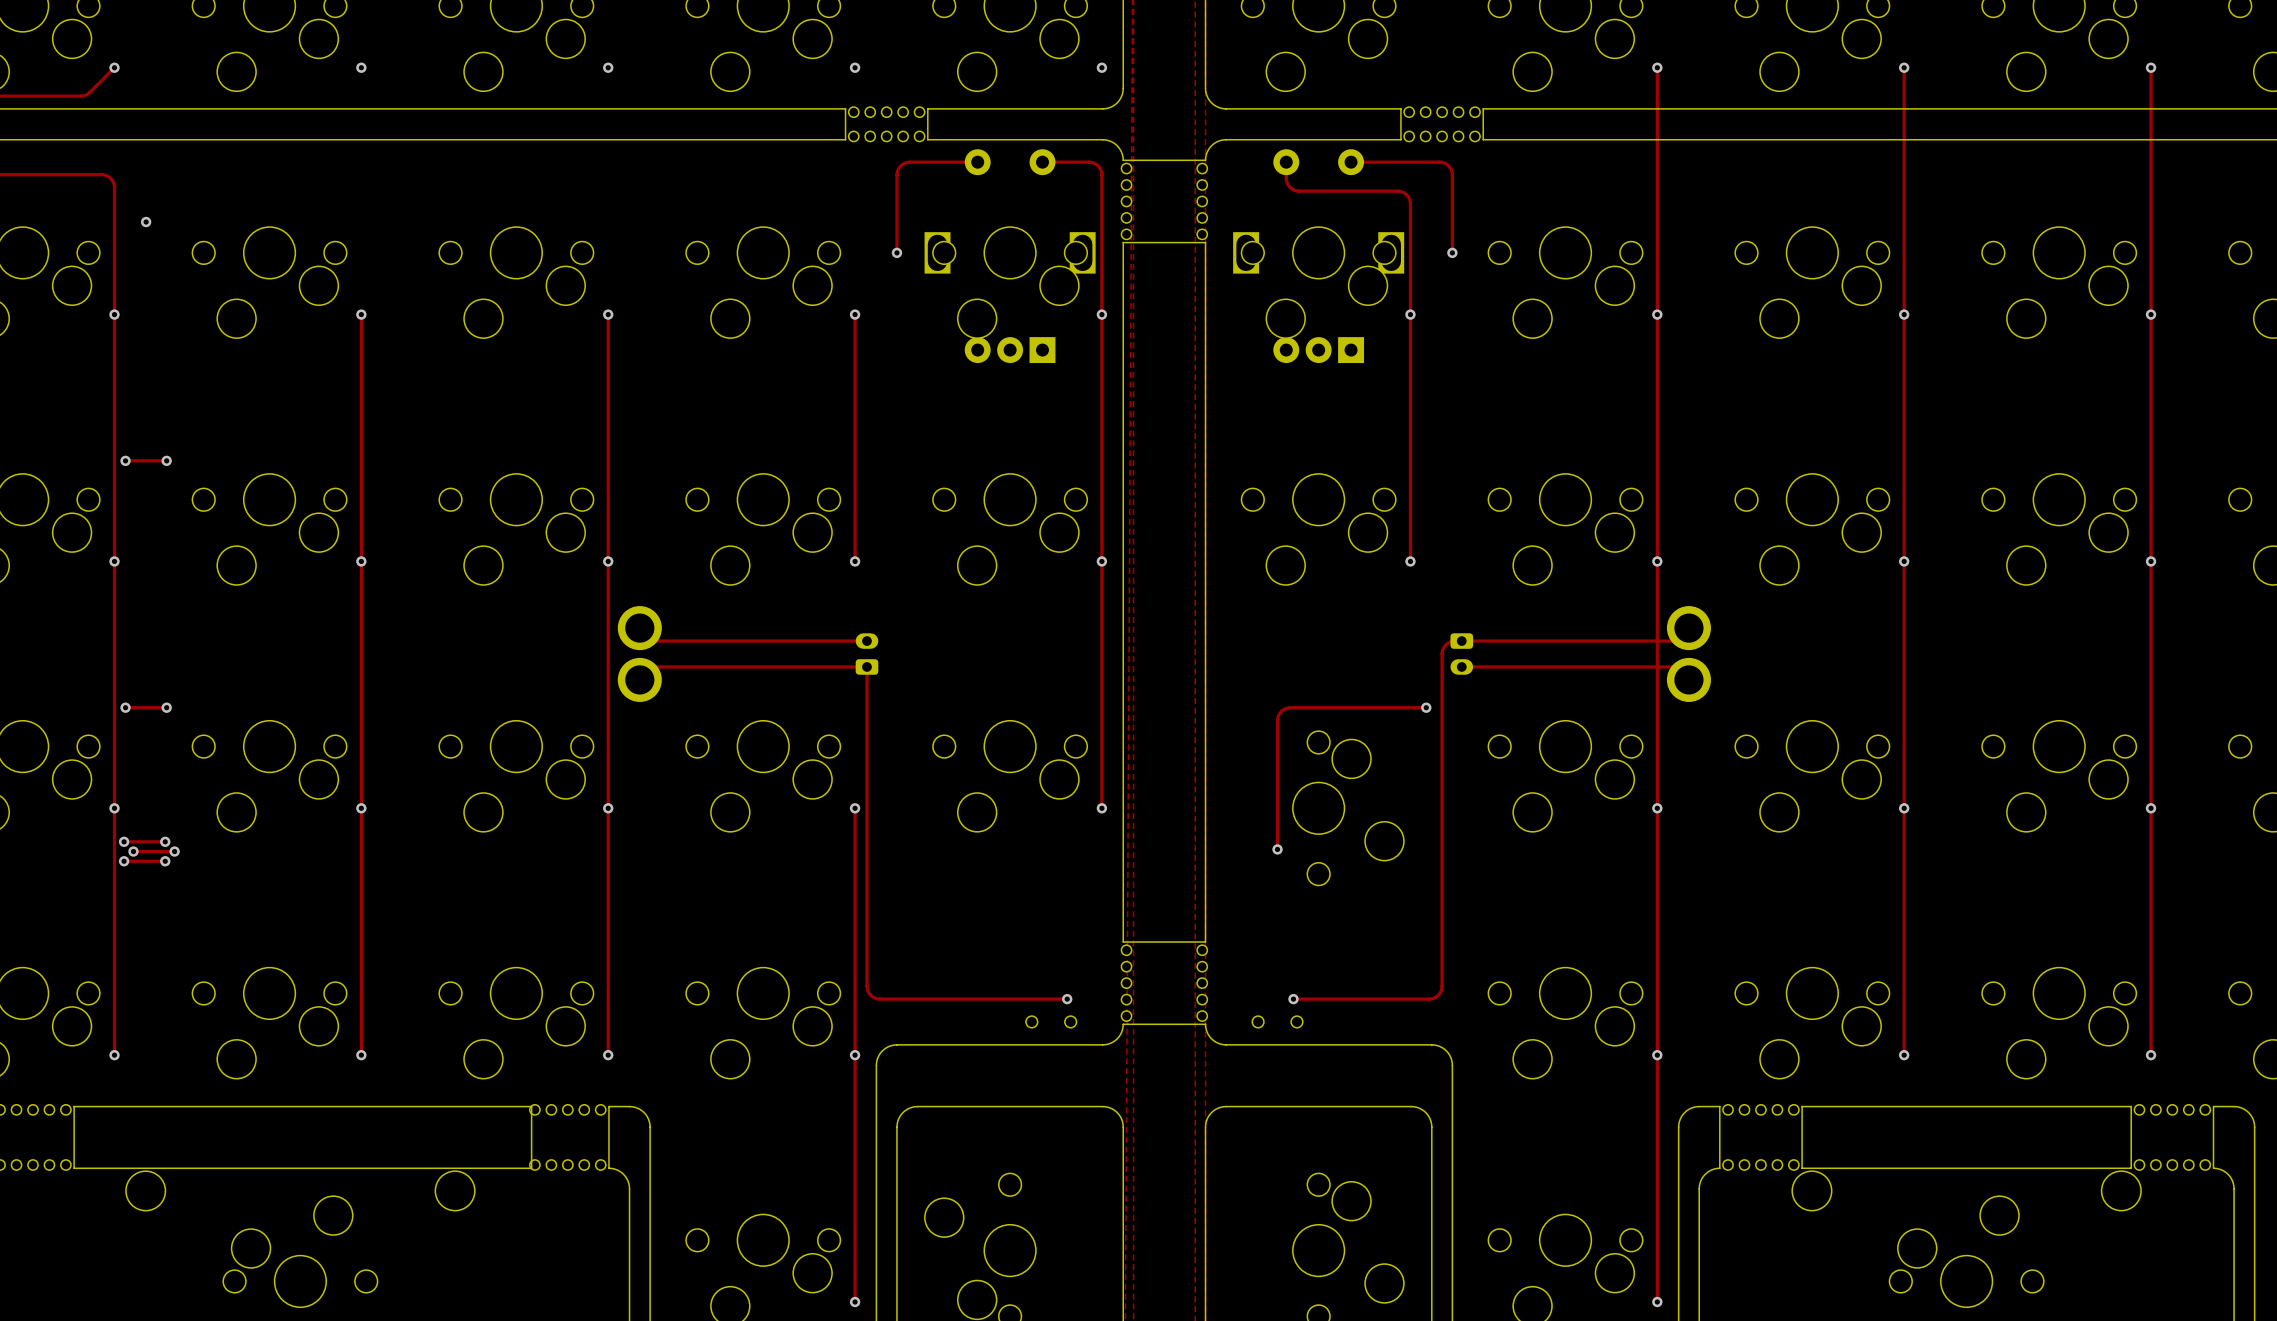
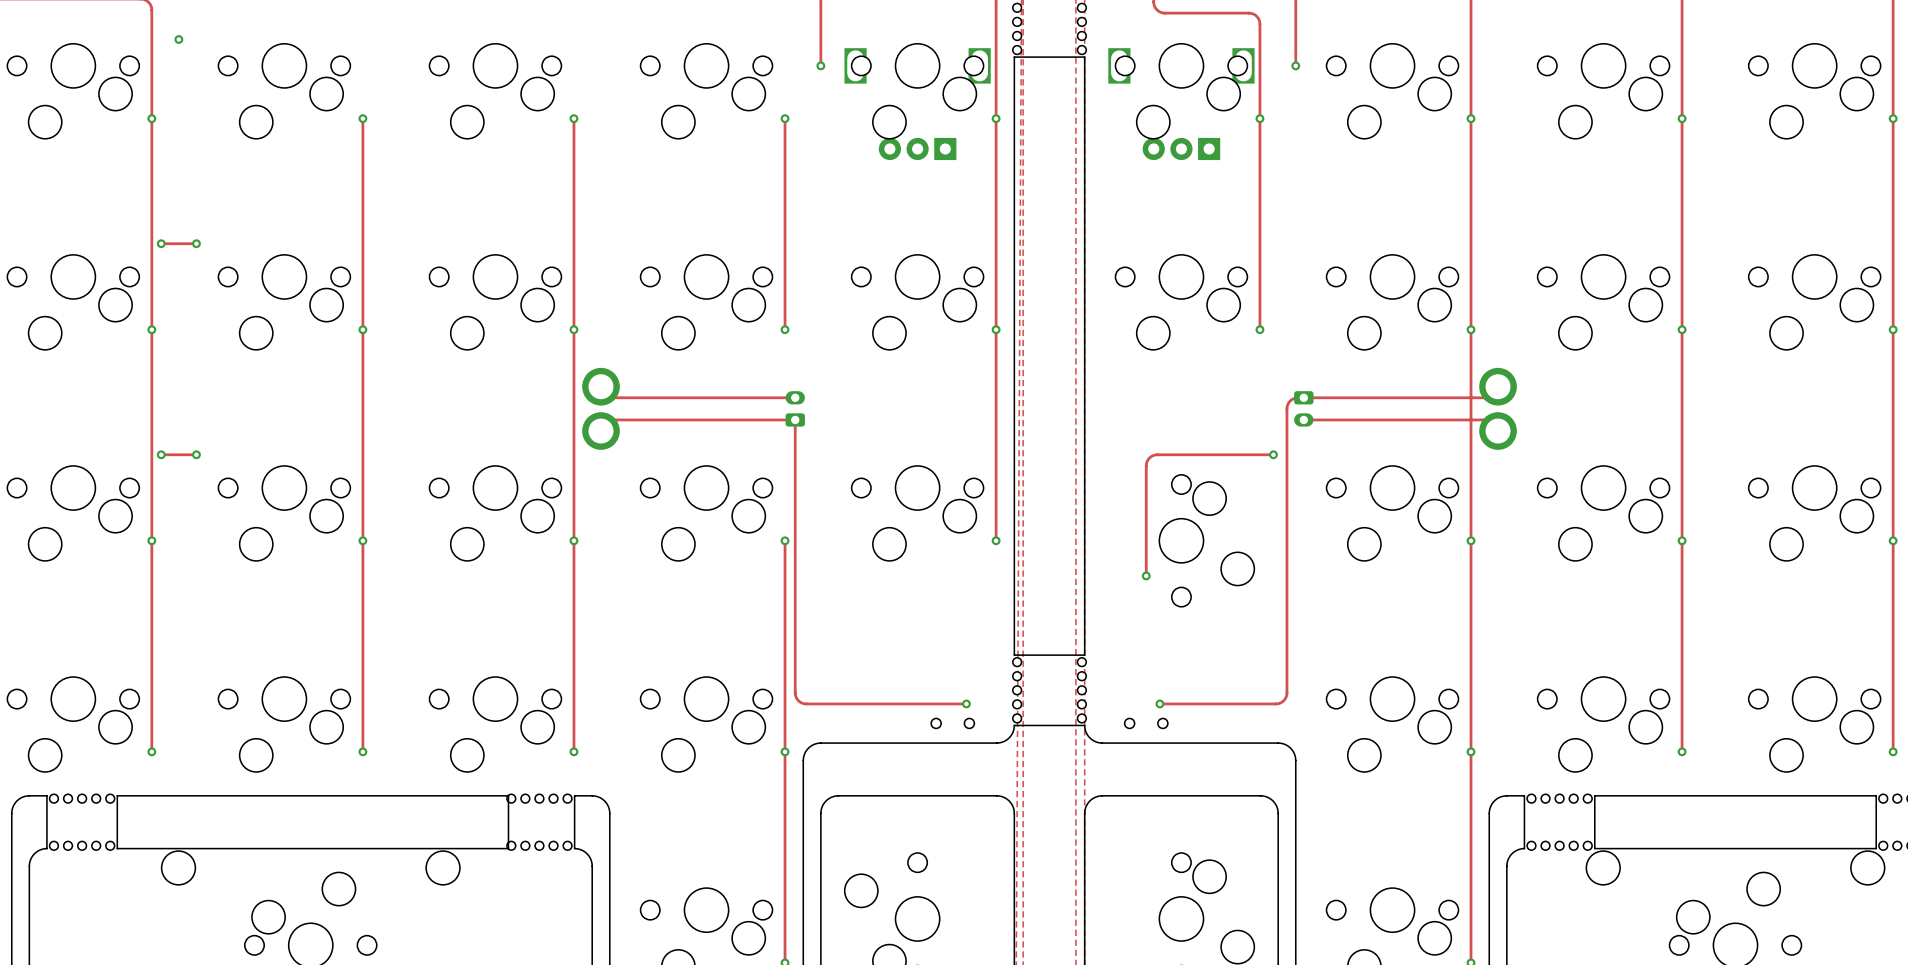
track: (124, 841) (165, 841) -> none
via: (124, 841) -> none
via: (165, 841) -> none
track: (133, 851) (174, 851) -> none
via: (133, 851) -> none
via: (174, 851) -> none
track: (124, 861) (165, 861) -> none
via: (124, 861) -> none
via: (165, 861) -> none

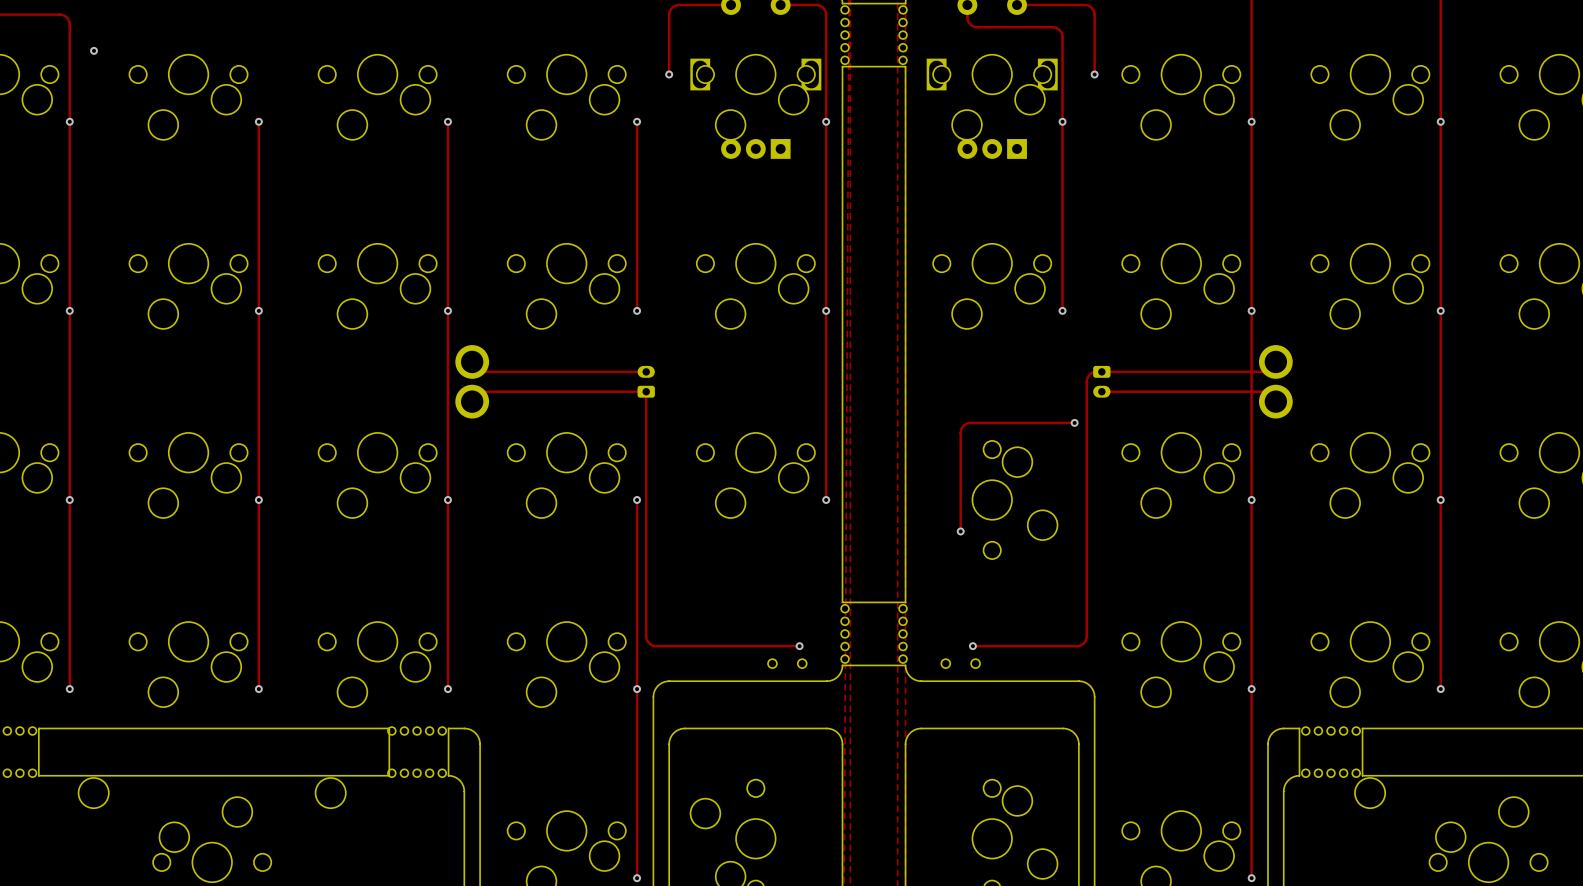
track: (161, 243) (196, 243) -> none
via: (161, 243) -> none
via: (196, 243) -> none
track: (161, 454) (196, 454) -> none
via: (161, 454) -> none
via: (196, 454) -> none

